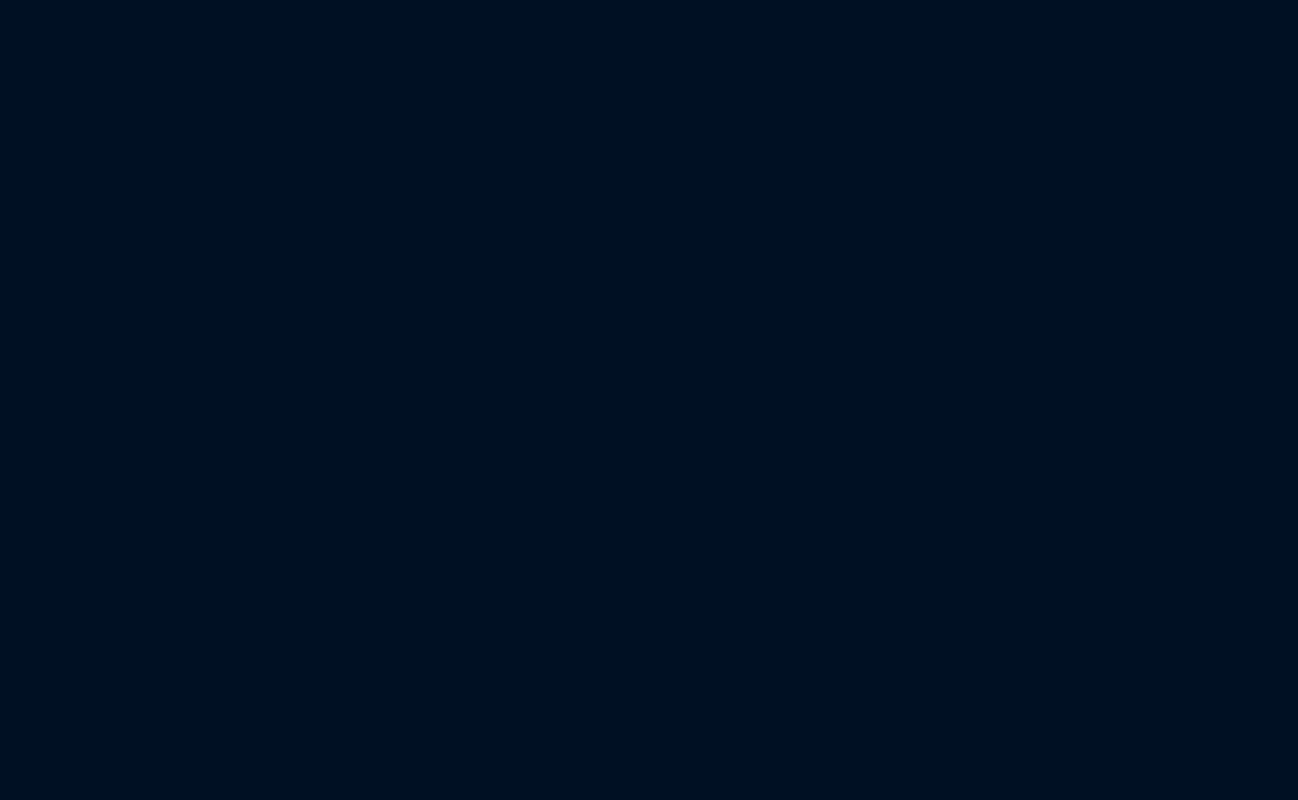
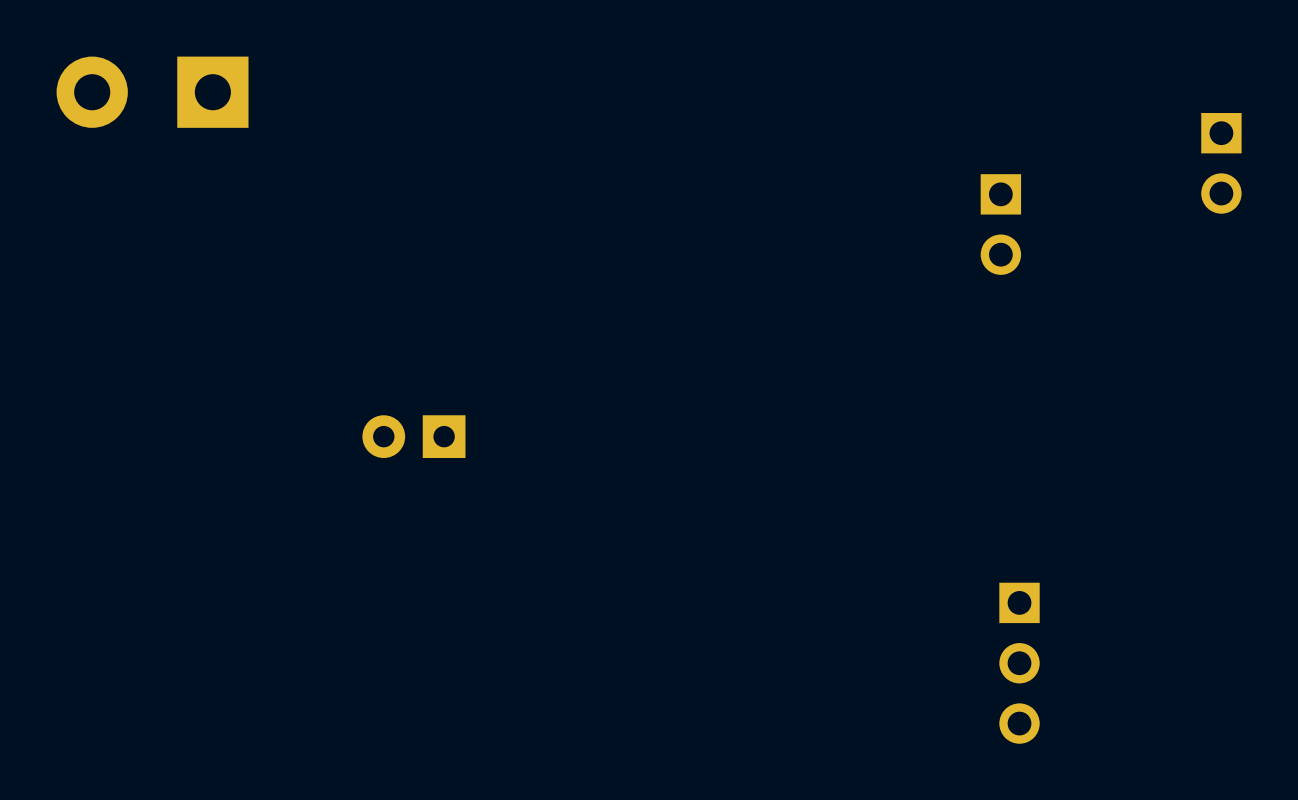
part: none -> (152, 92)
part: none -> (1221, 163)
part: none -> (1000, 224)
part: none -> (413, 436)
part: none -> (1019, 663)

